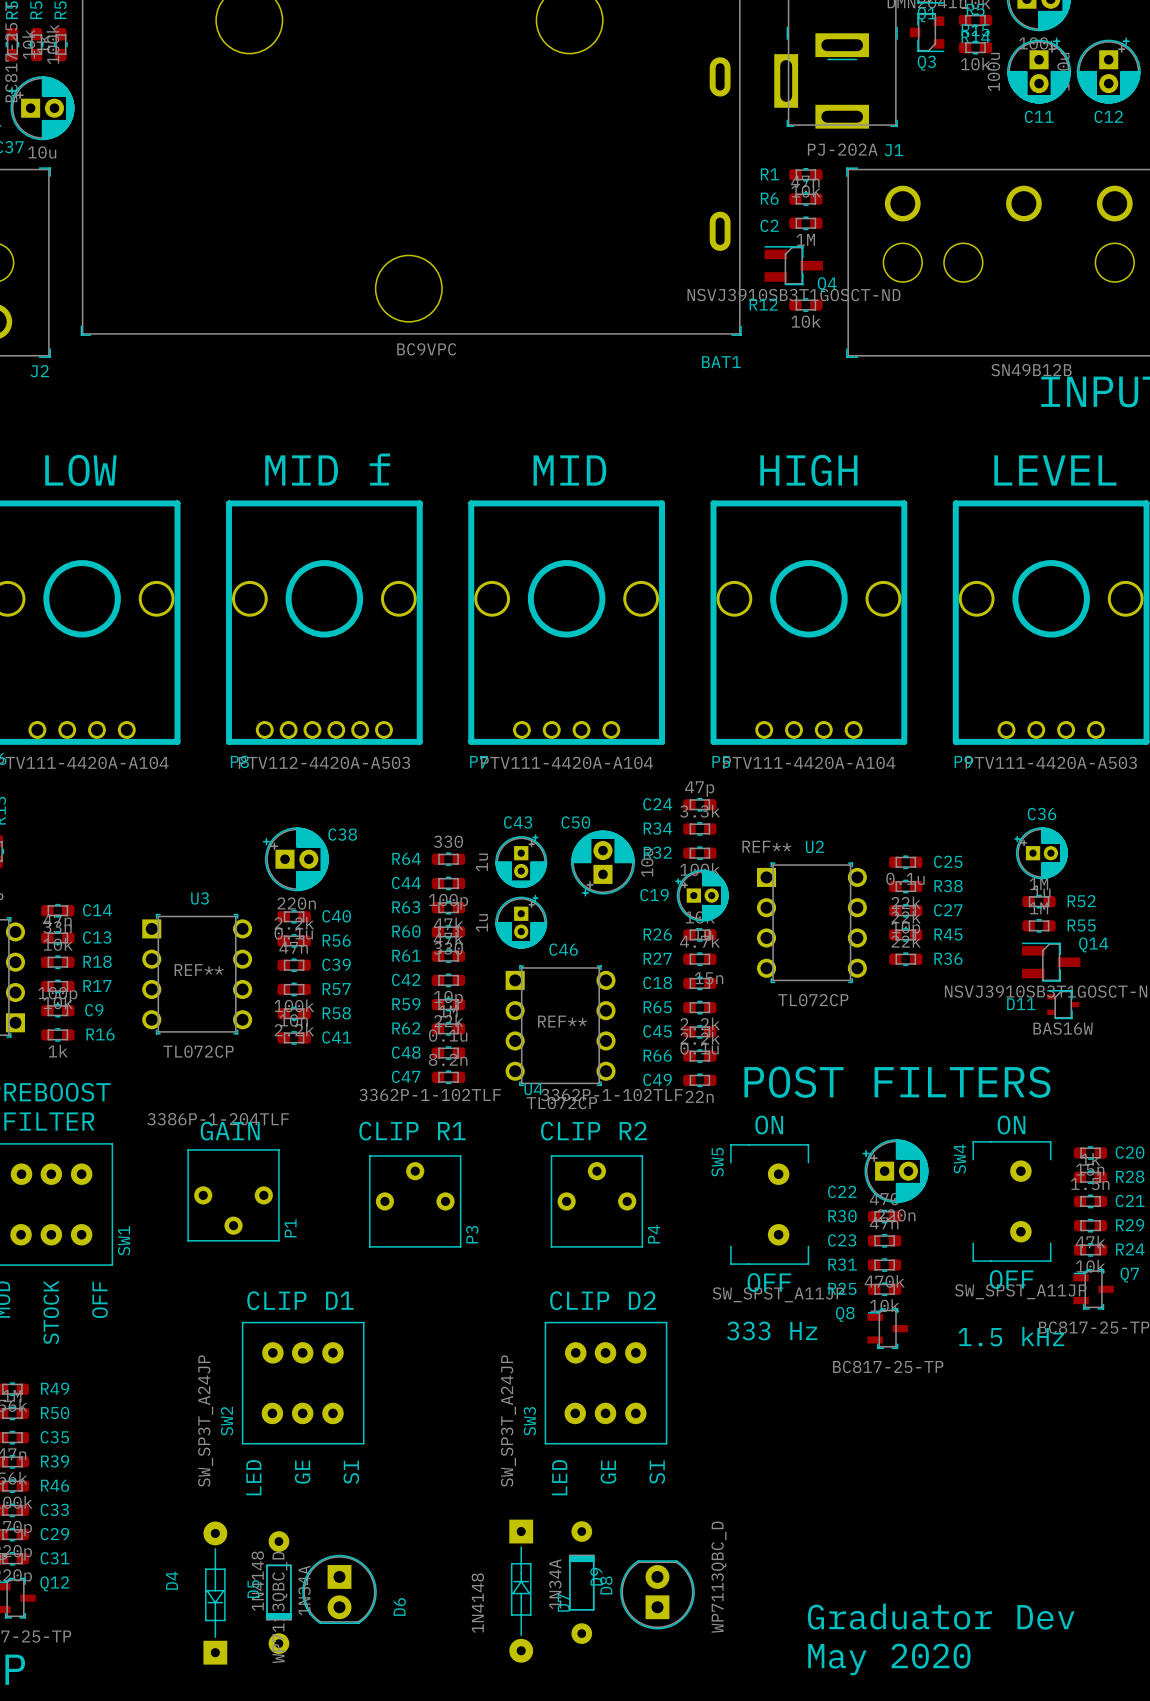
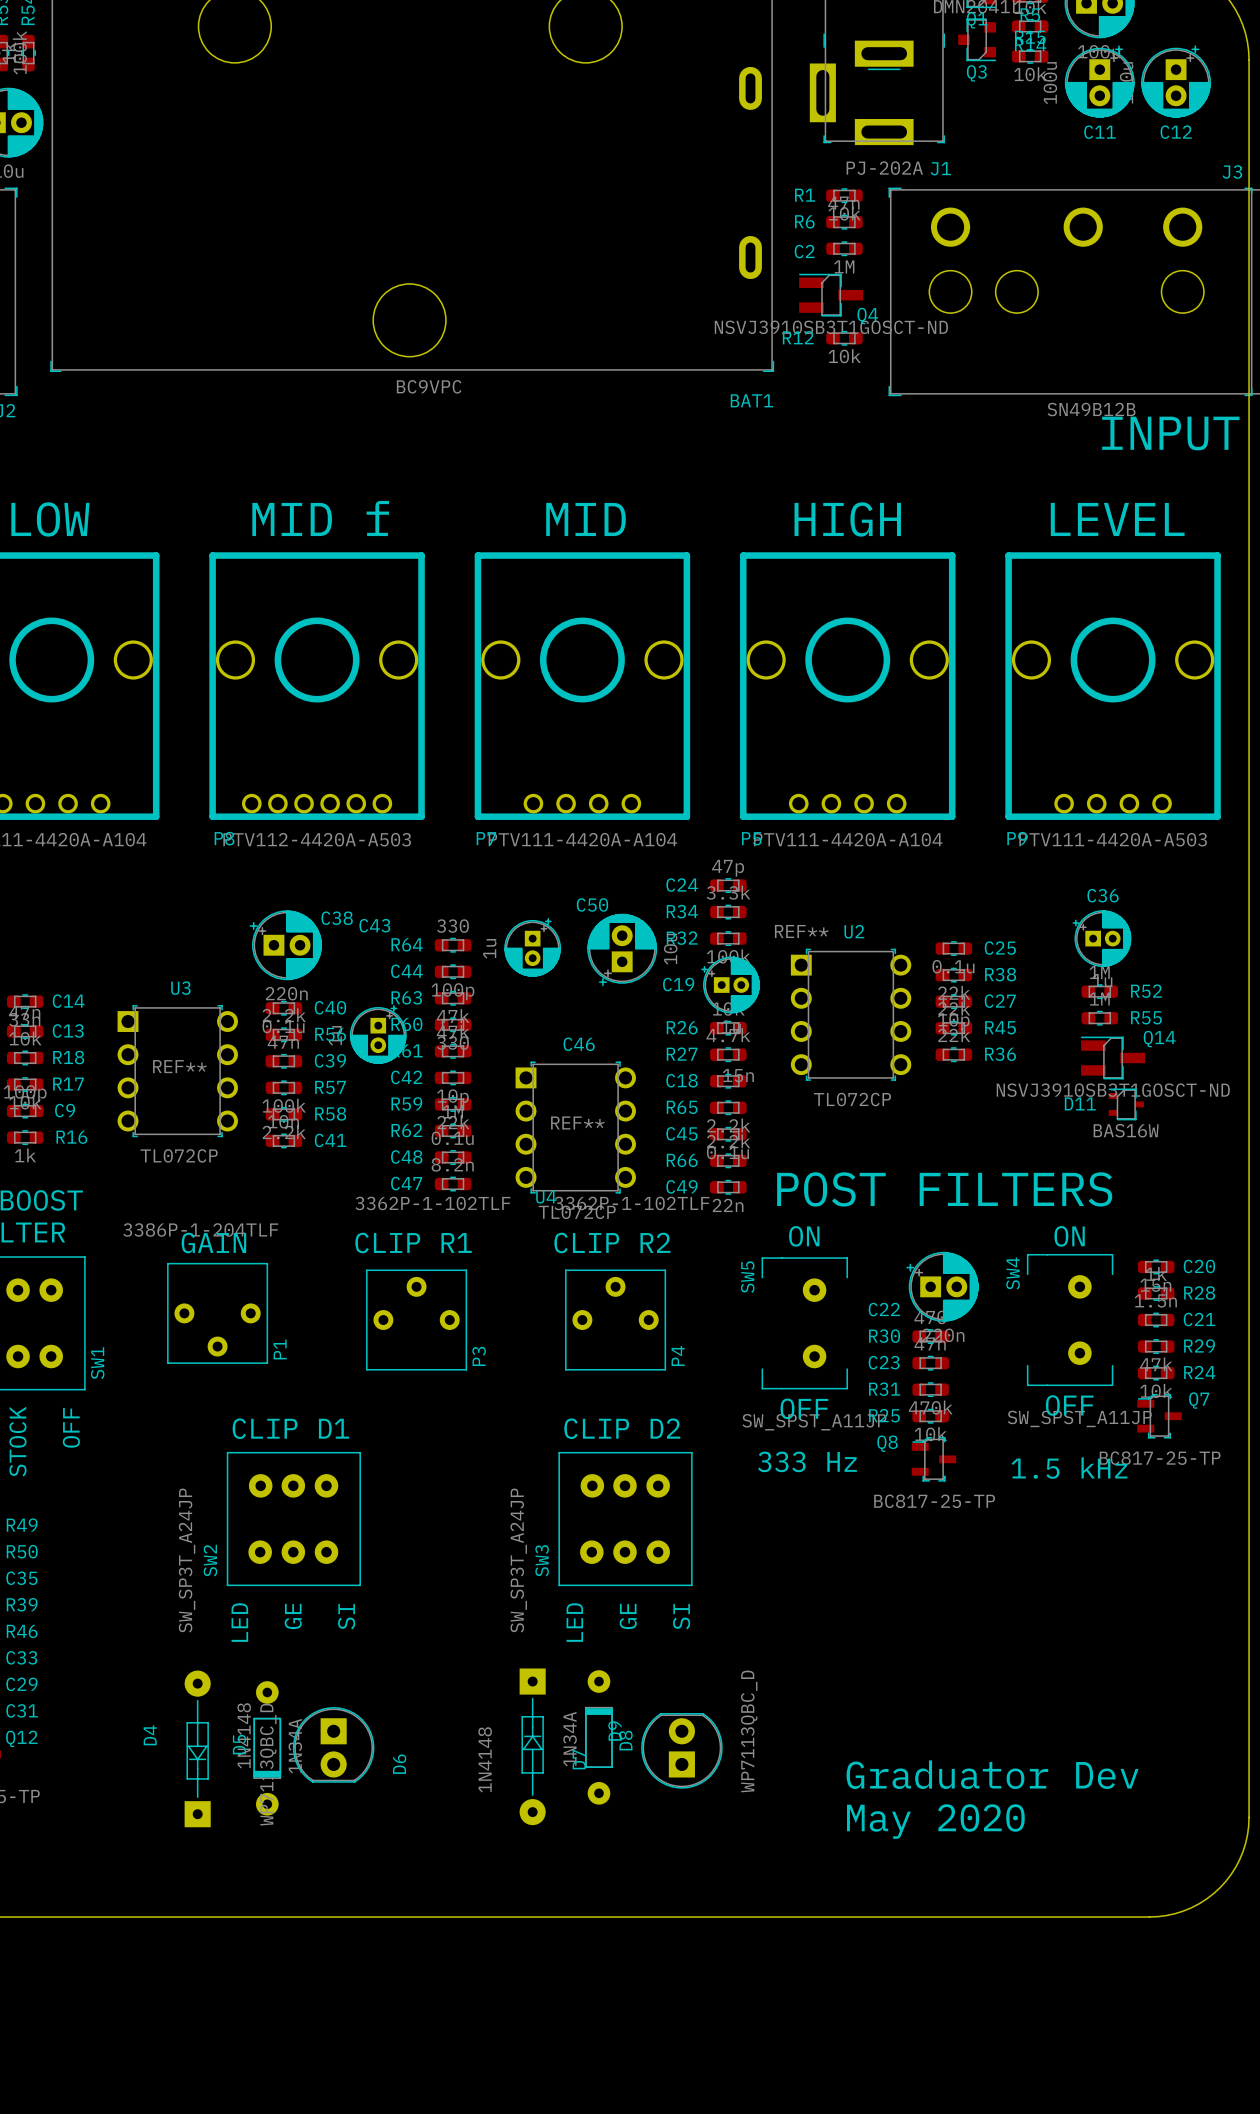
C43 position: (521, 921) -> (378, 1034)

